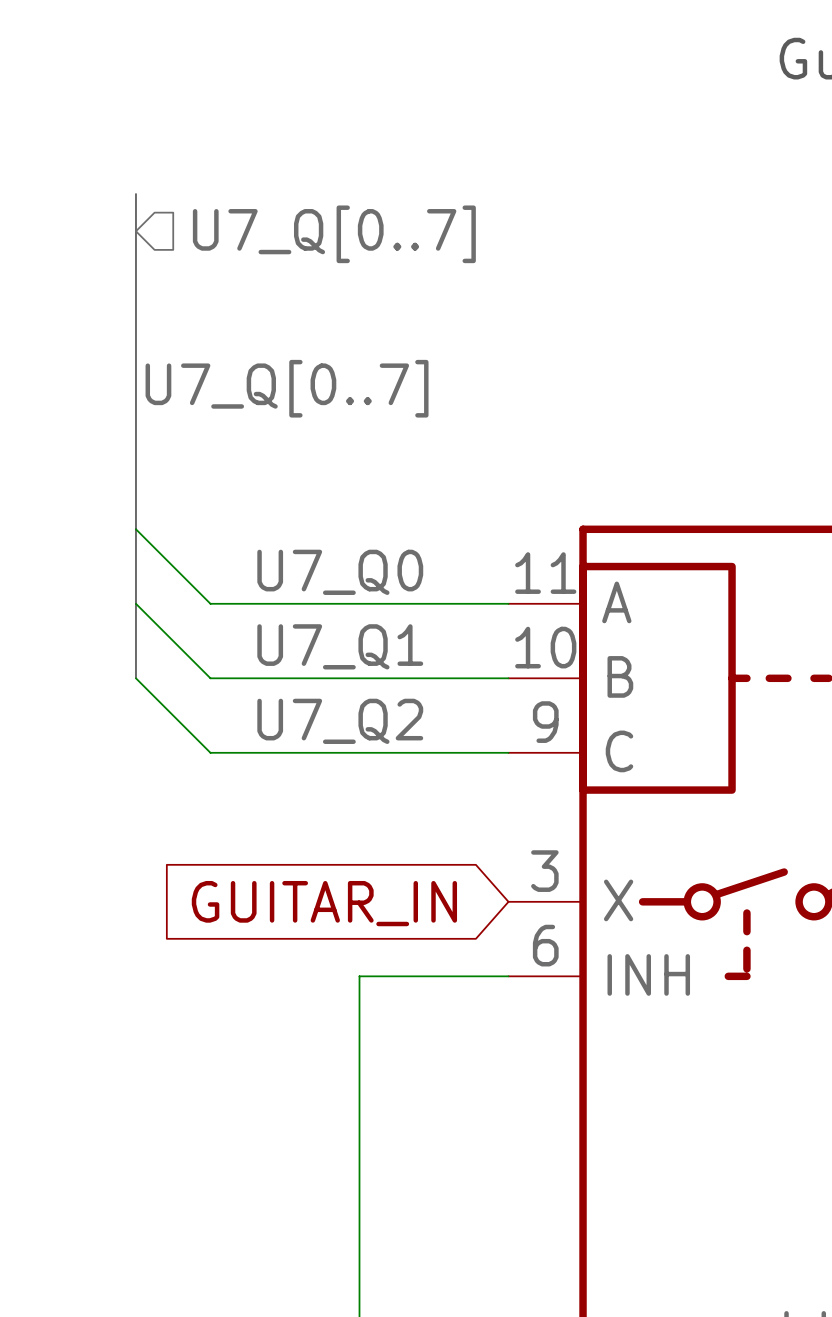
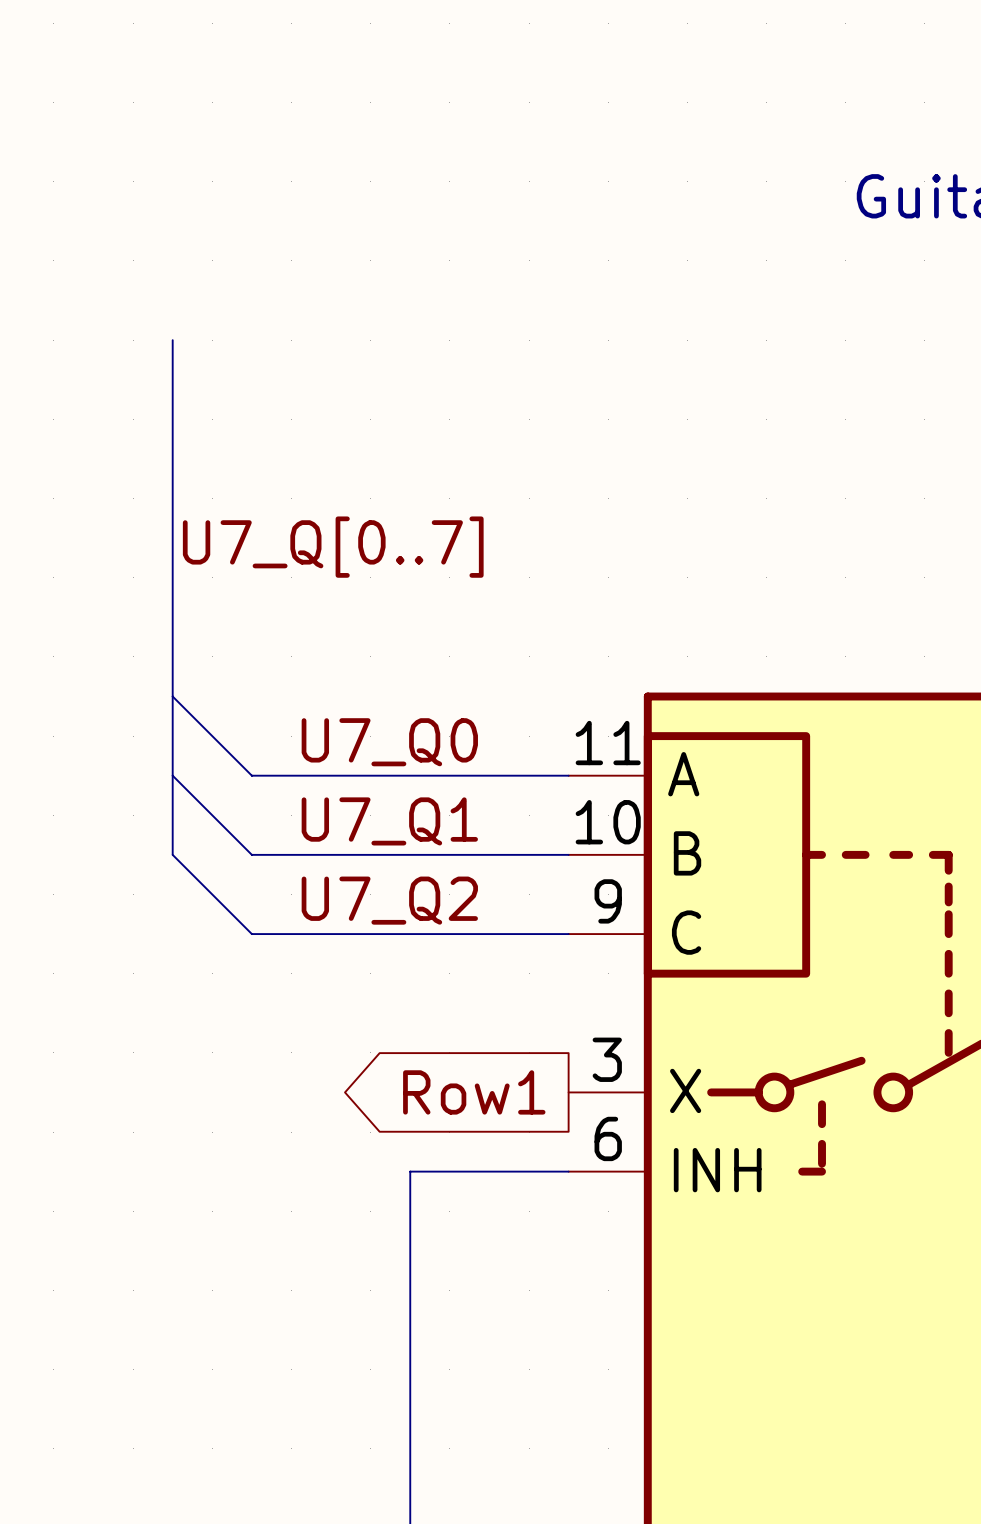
hierarchical label: U7_Q[0..7] (334, 234) -> none
global label shape: input (324, 903) -> output (474, 1092)
global label: GUITAR_IN (324, 903) -> Row1 (474, 1092)

